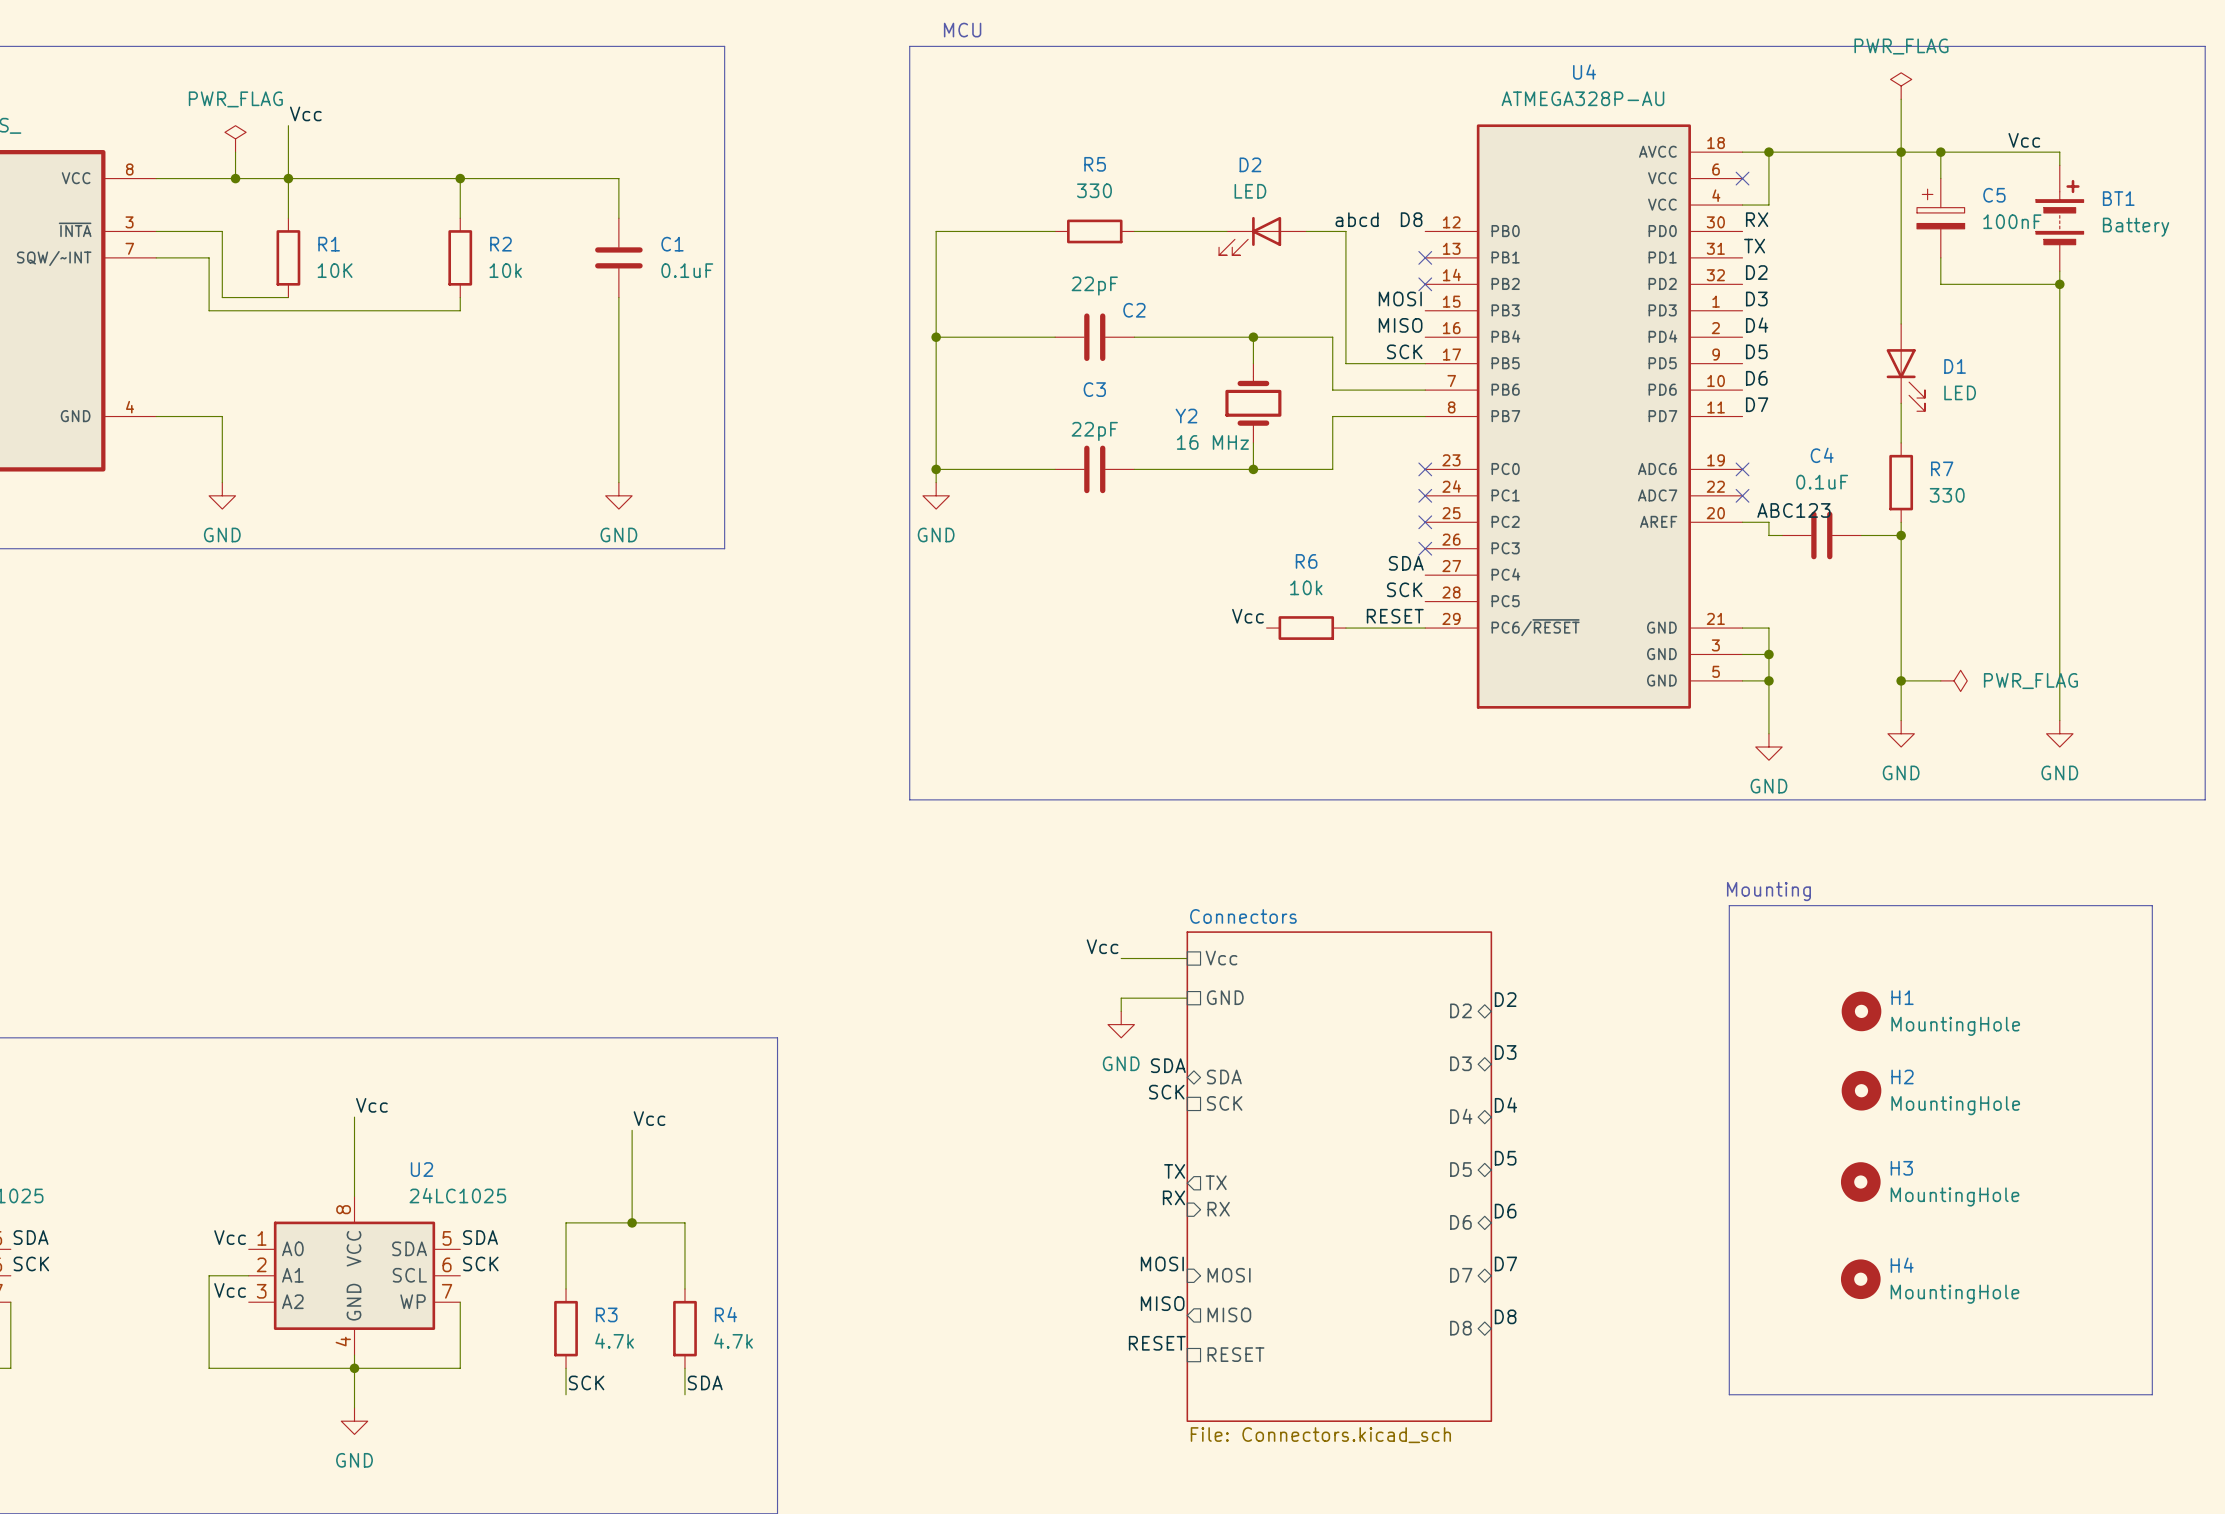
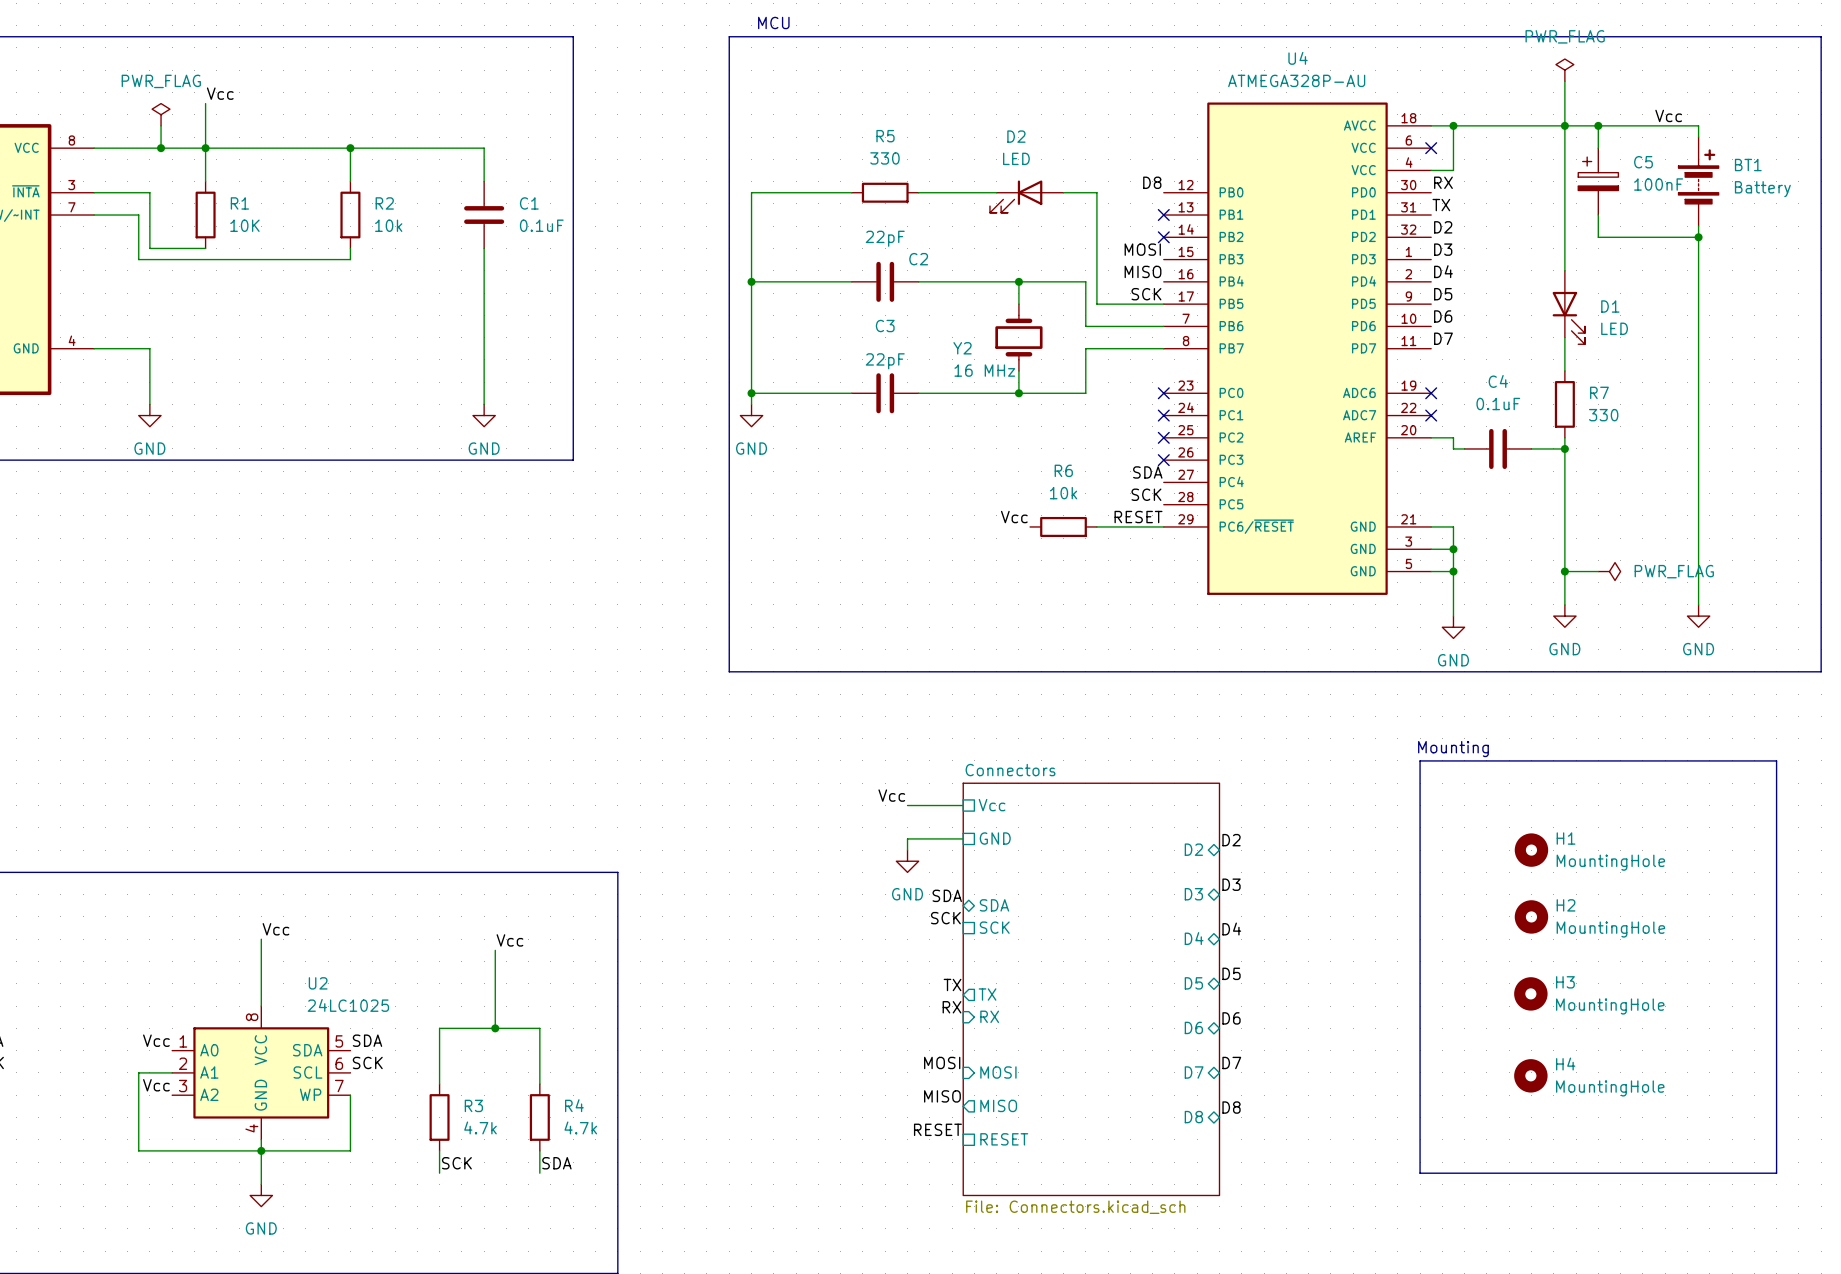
label: abcd (1357, 219) -> none
label: ABC123 (1793, 510) -> none

